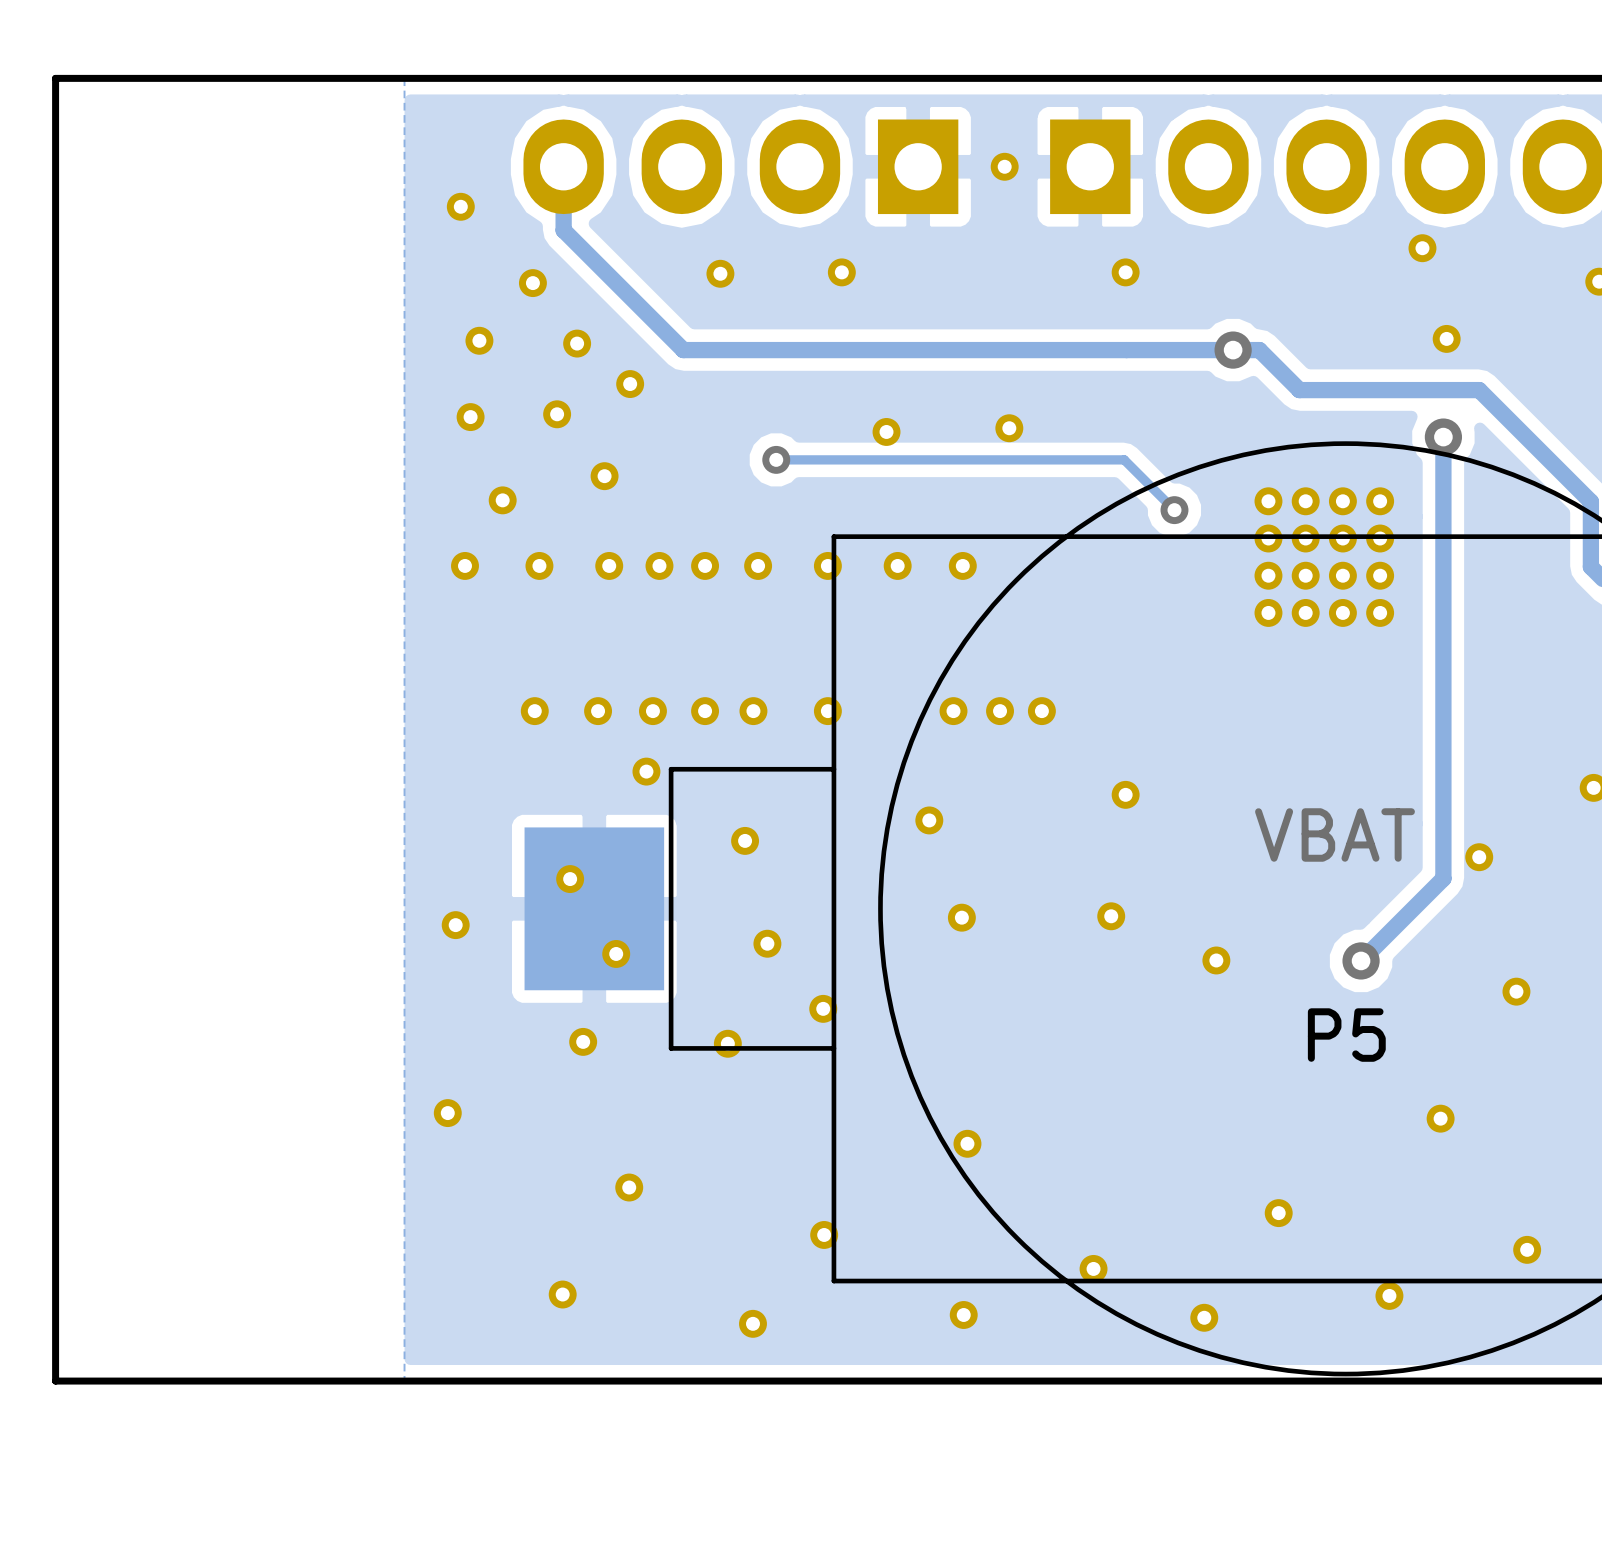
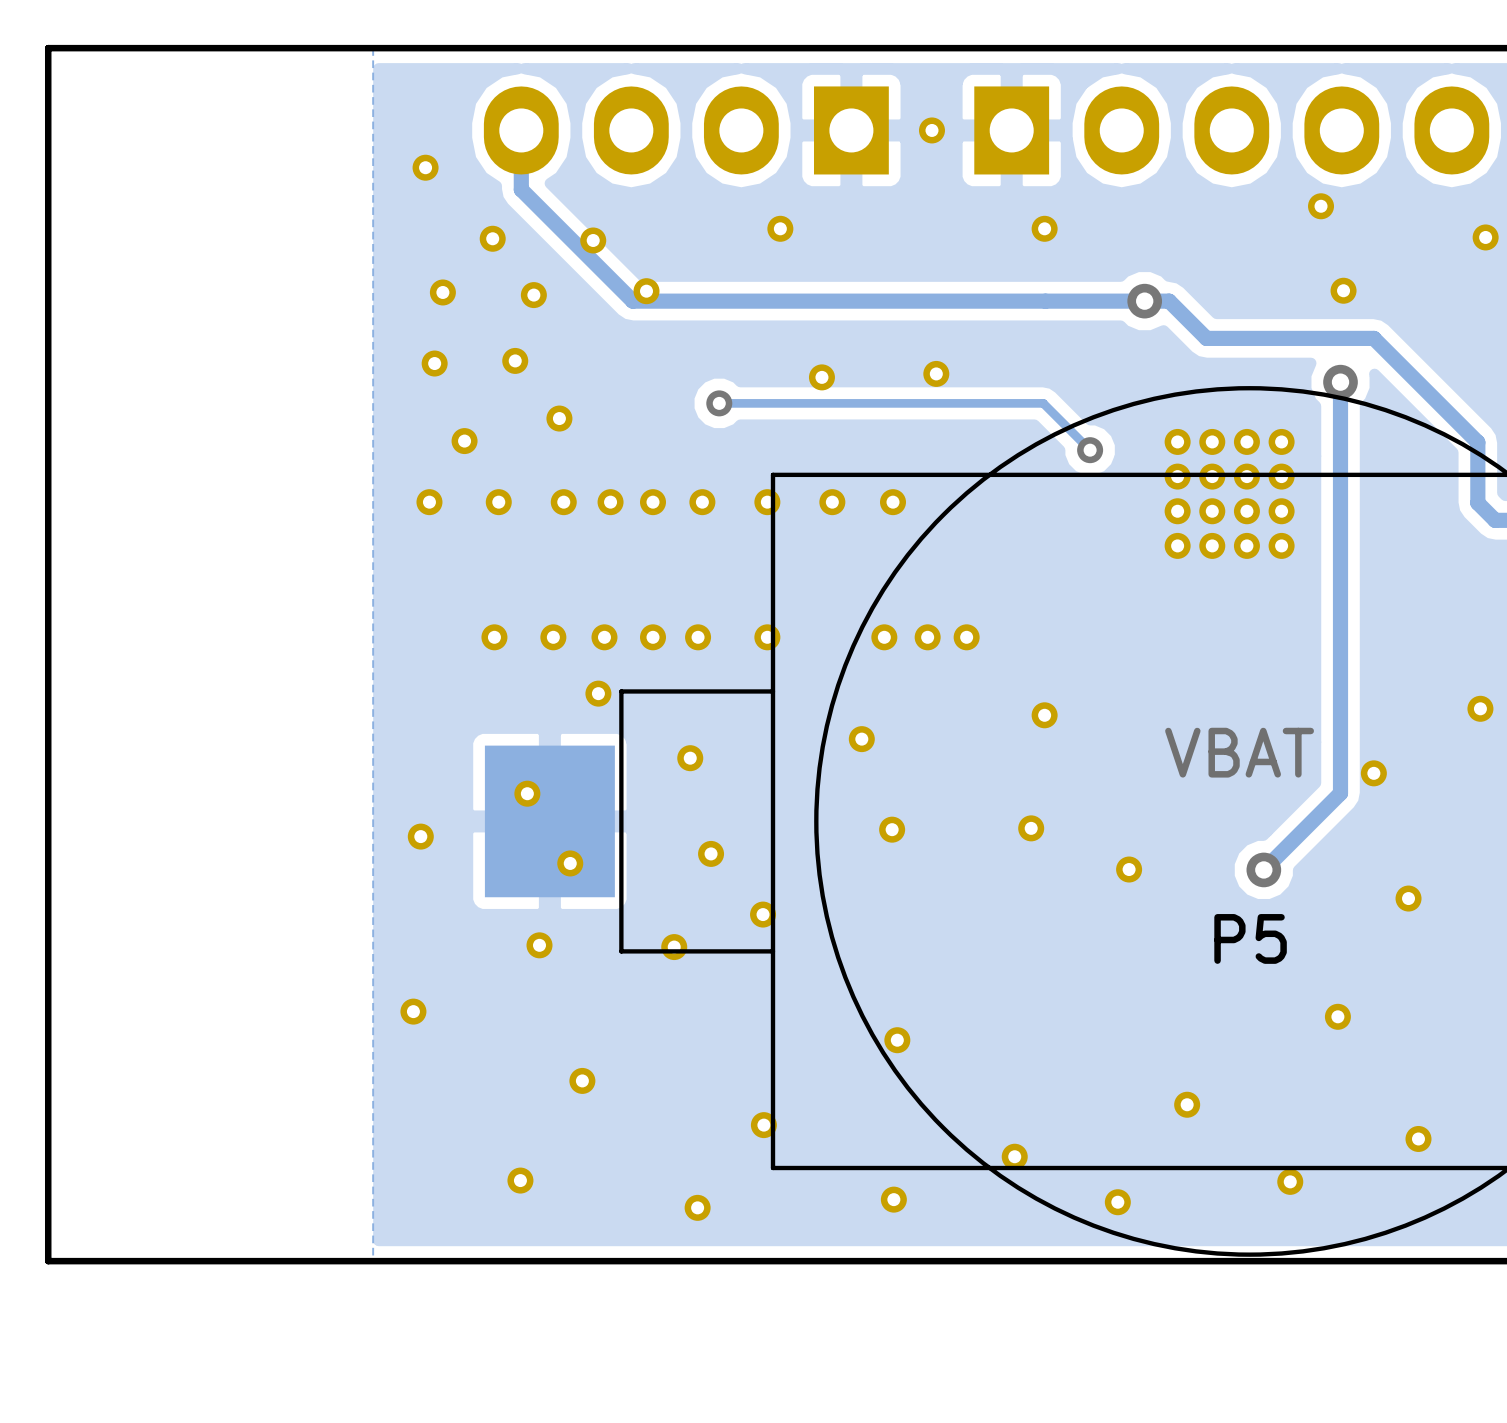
part: (720, 273) -> none
part: none -> (593, 240)
part: none -> (646, 291)
part: (630, 384) -> none

